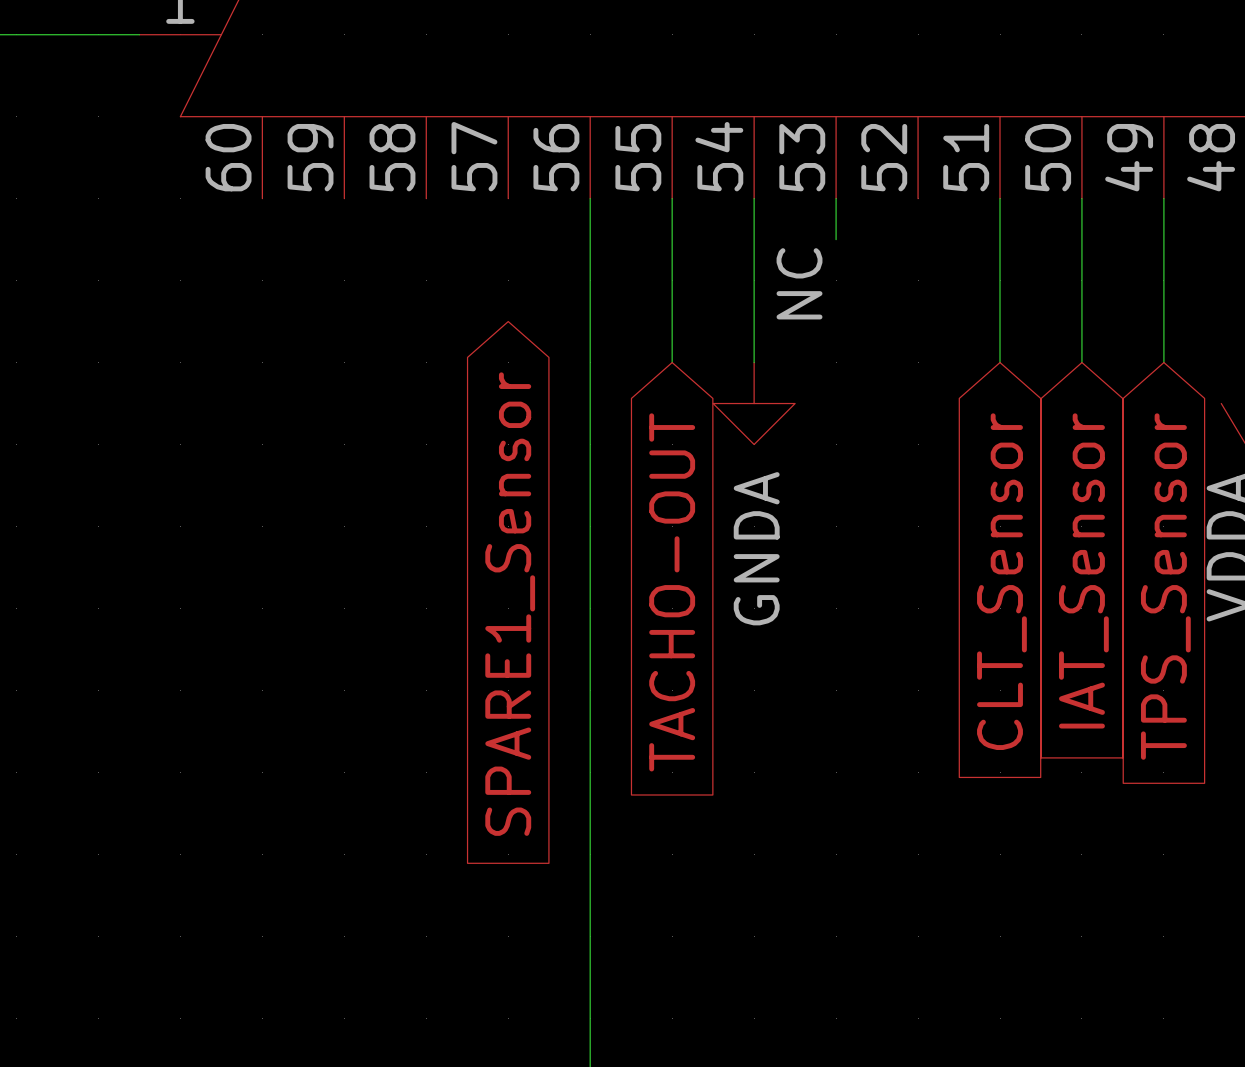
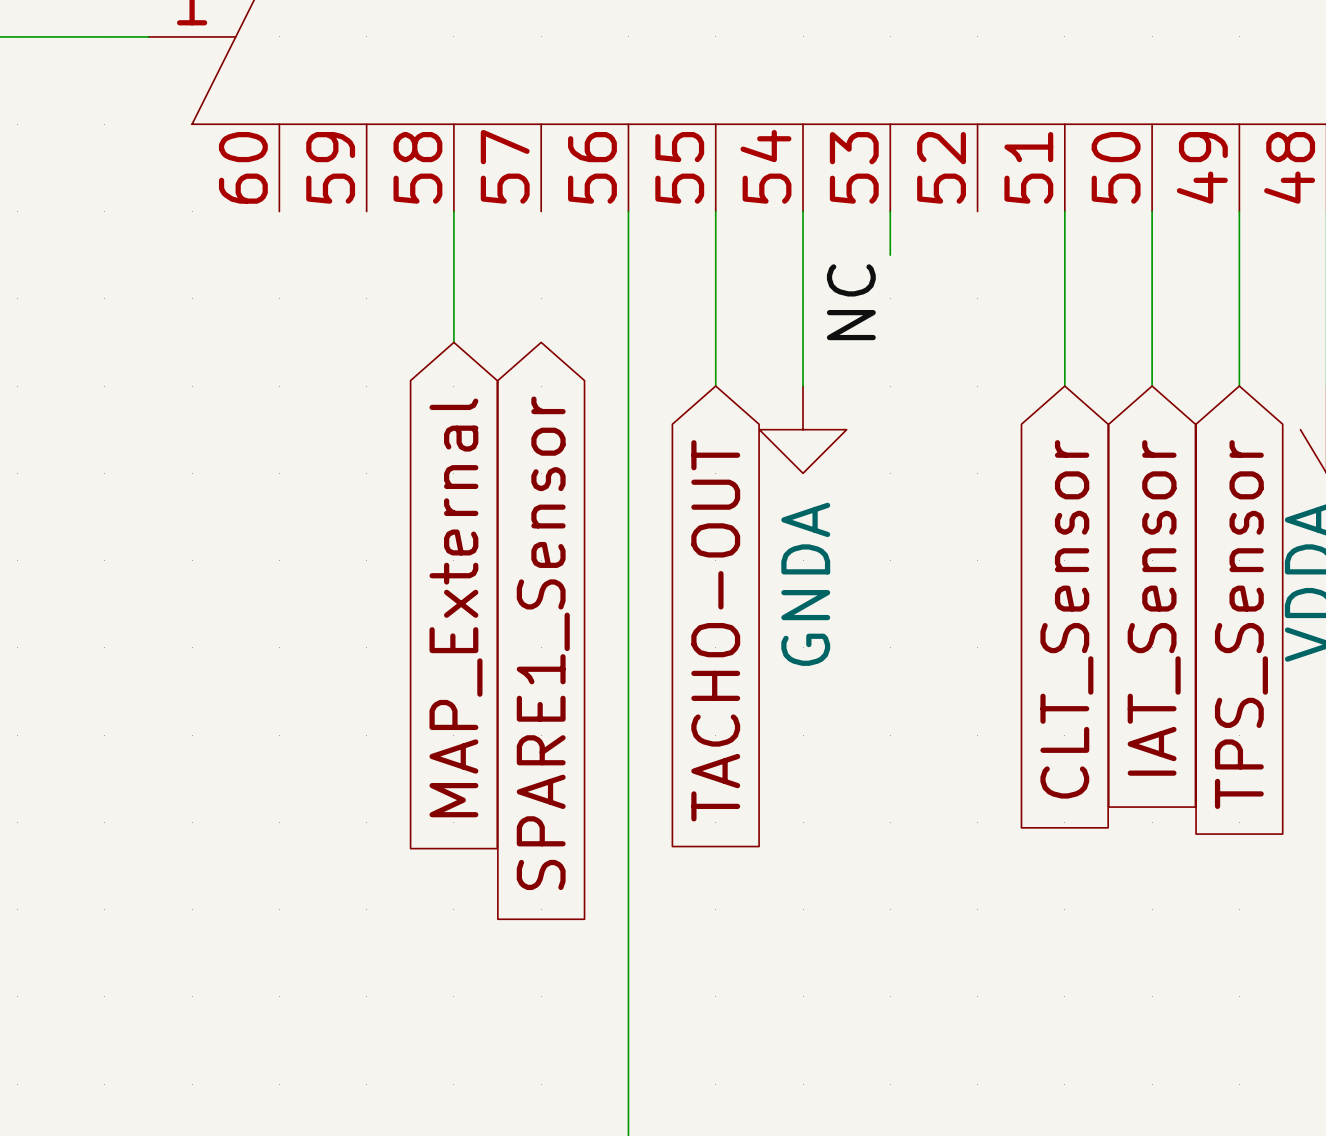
wire: none -> (453, 211) (453, 342)
global label: none -> MAP_External (455, 607)

